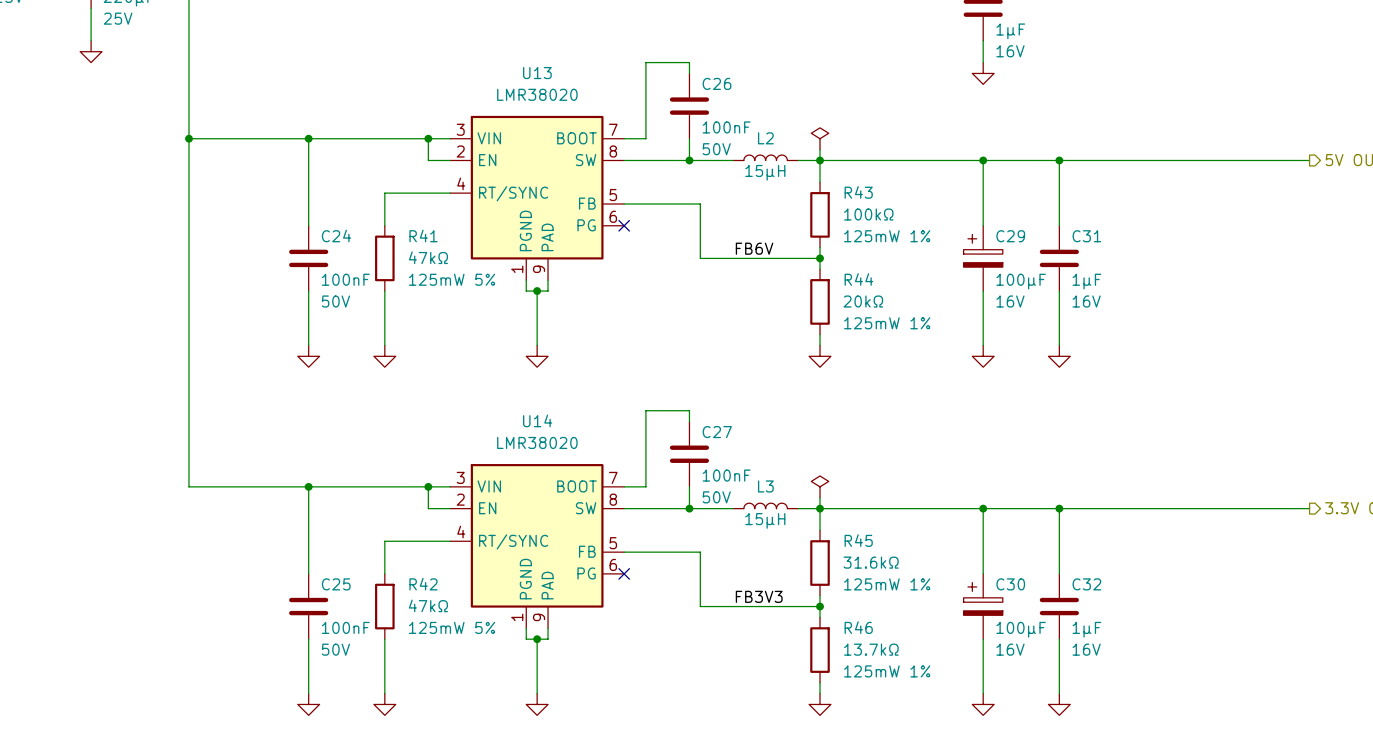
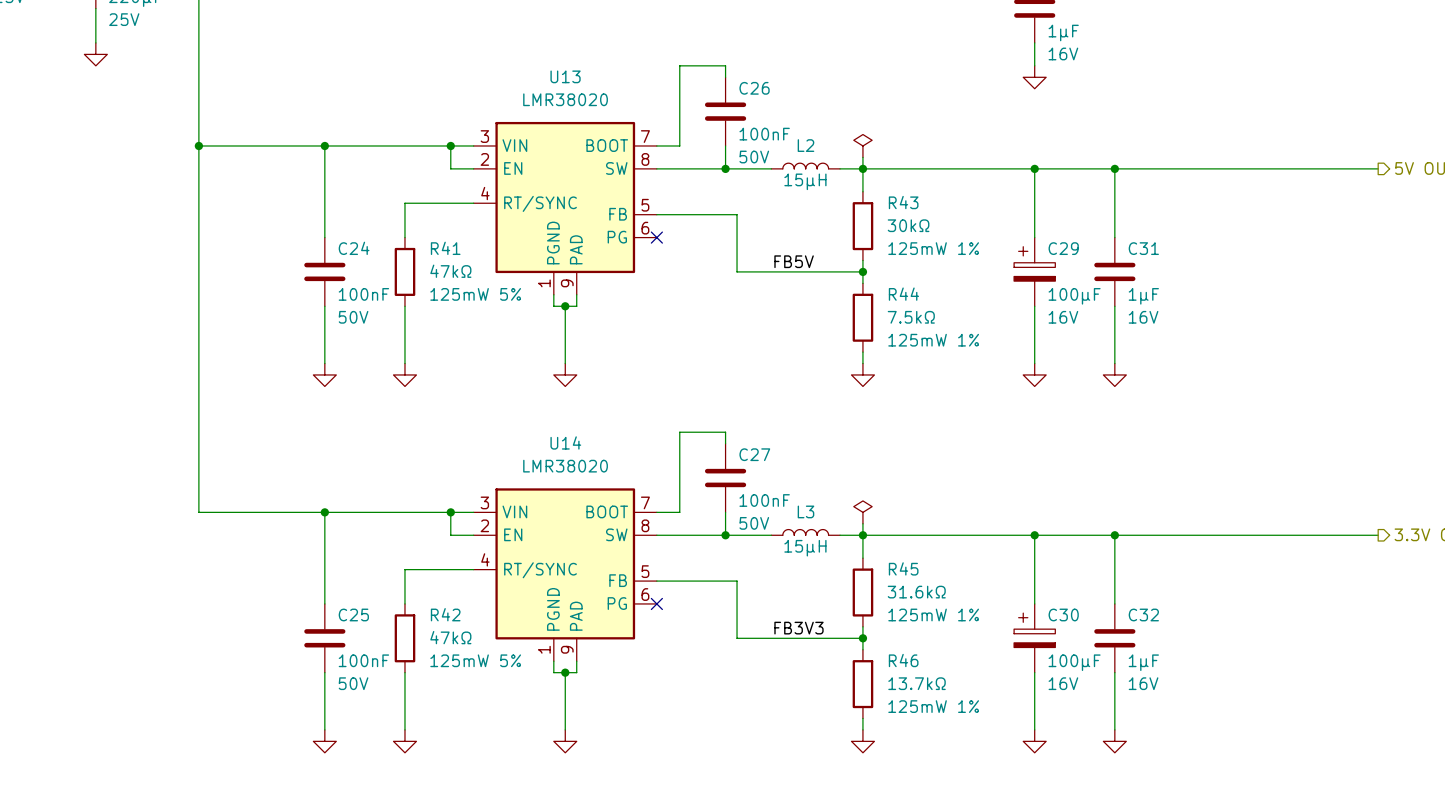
R43 value: 100kΩ (868, 214) -> 30kΩ (908, 225)
label: FB6V (754, 248) -> FB5V (794, 261)
R44 value: 20kΩ (863, 301) -> 7.5kΩ (911, 317)

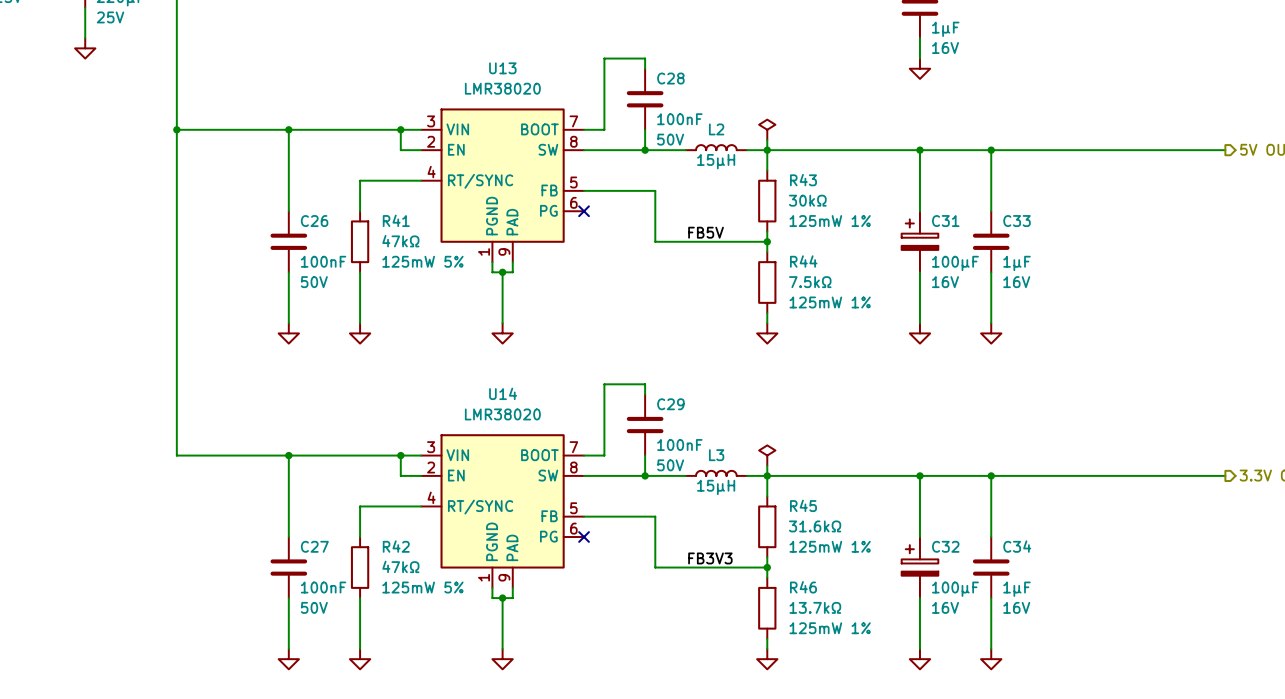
C26 name: C26 (754, 88) -> C28 (670, 78)
C24 name: C24 (354, 248) -> C26 (314, 221)
C29 name: C29 (1063, 248) -> C31 (945, 221)
C31 name: C31 (1143, 248) -> C33 (1017, 221)
C27 name: C27 (754, 454) -> C29 (670, 404)
C25 name: C25 (353, 614) -> C27 (314, 546)
C30 name: C30 (1063, 614) -> C32 (945, 546)
C32 name: C32 (1143, 614) -> C34 (1017, 546)

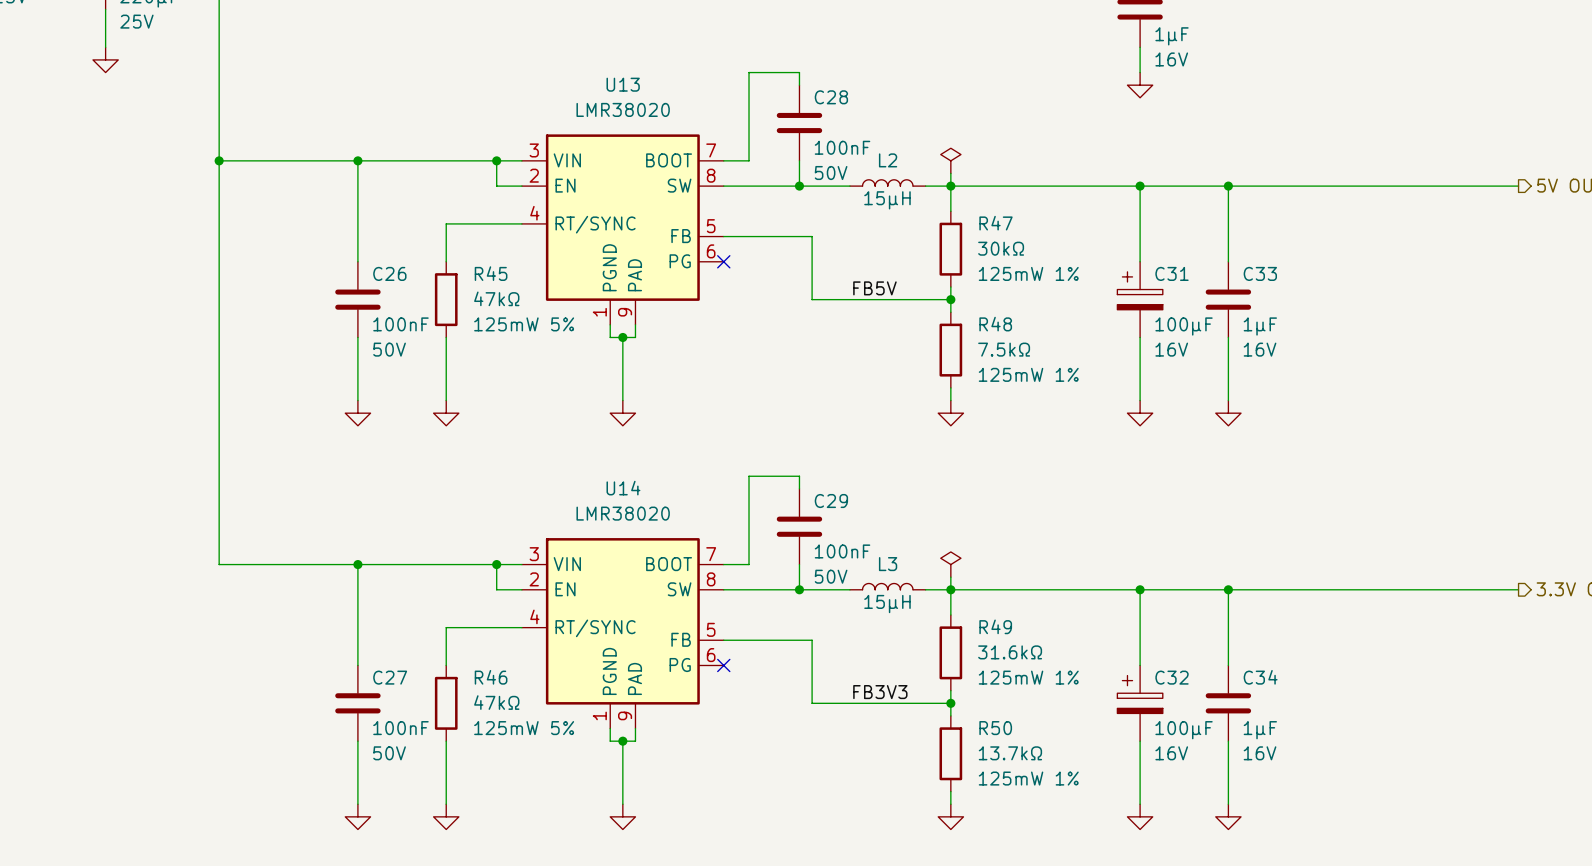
R43 name: R43 (803, 180) -> R47 (996, 223)
R41 name: R41 (396, 220) -> R45 (491, 273)
R44 name: R44 (803, 261) -> R48 (995, 324)
R45 name: R45 (803, 505) -> R49 (995, 626)
R42 name: R42 (396, 546) -> R46 (491, 677)
R46 name: R46 (803, 587) -> R50 (995, 728)

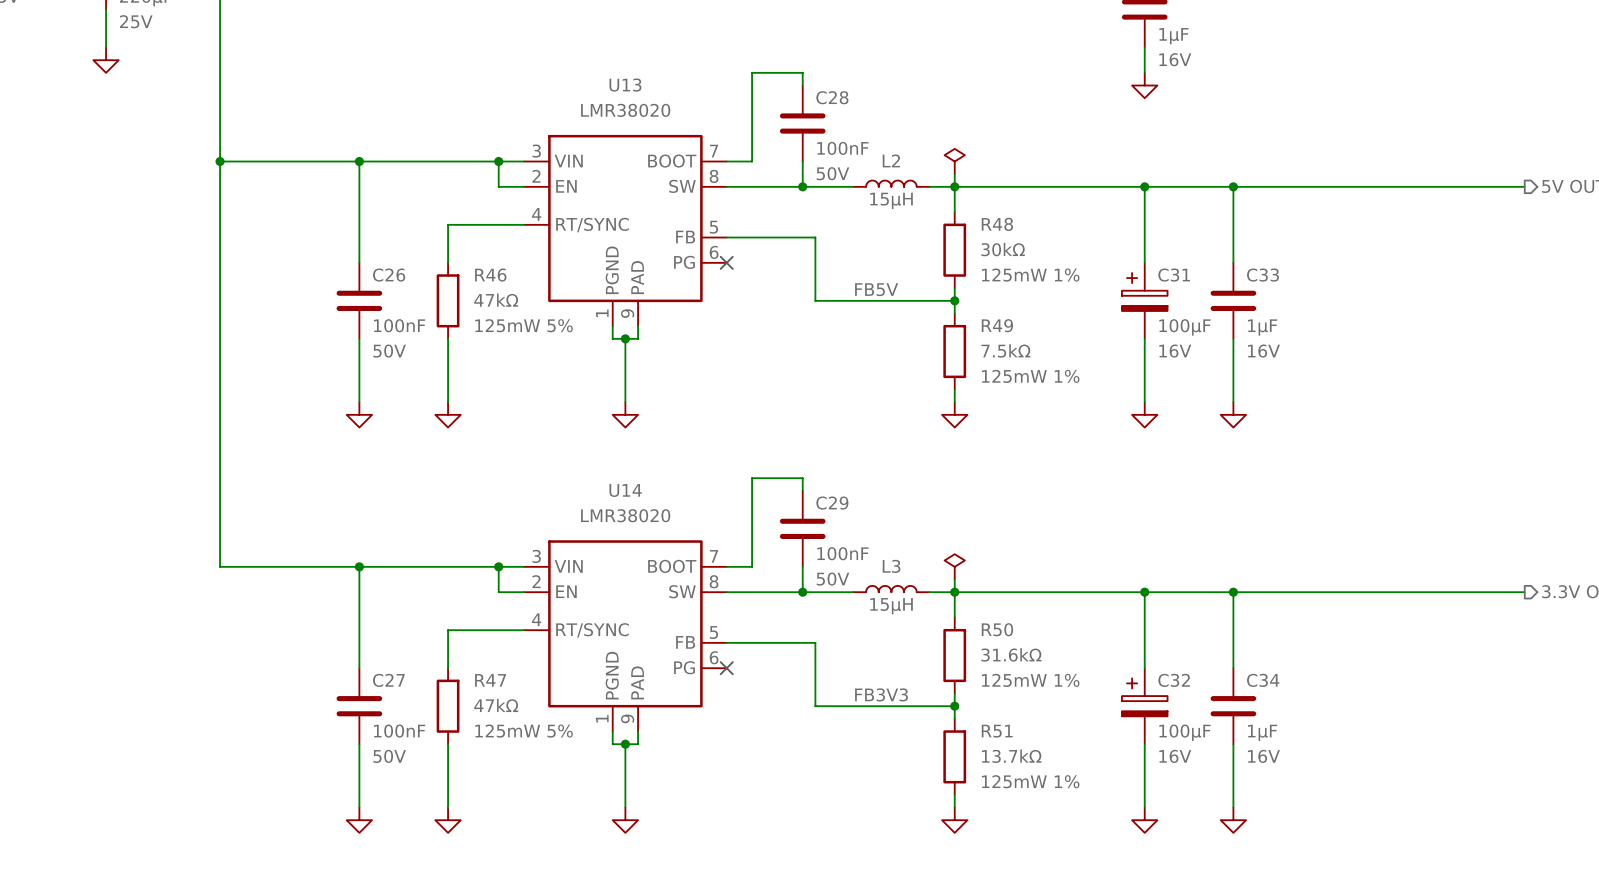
R47 name: R47 (996, 223) -> R48 (997, 224)
R45 name: R45 (491, 273) -> R46 (490, 275)
R48 name: R48 (995, 324) -> R49 (997, 325)
R49 name: R49 (995, 626) -> R50 (997, 629)
R46 name: R46 (491, 677) -> R47 (490, 680)
R50 name: R50 (995, 728) -> R51 (997, 731)

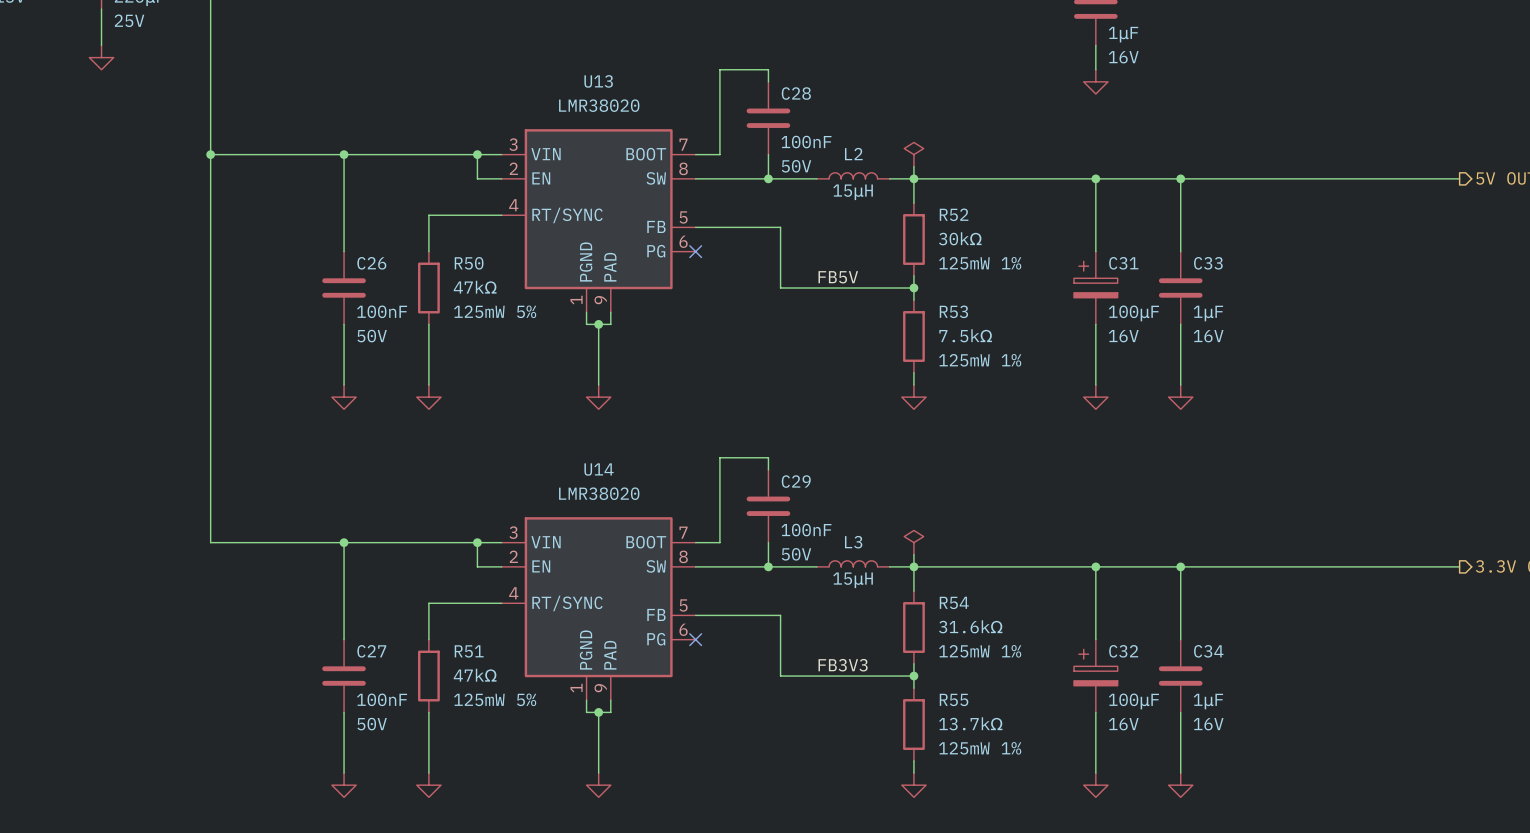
R48 name: R48 (997, 224) -> R52 (954, 214)
R46 name: R46 (490, 275) -> R50 (469, 263)
R49 name: R49 (997, 325) -> R53 (953, 311)
R50 name: R50 (997, 629) -> R54 (954, 602)
R47 name: R47 (490, 680) -> R51 (469, 651)
R51 name: R51 (997, 731) -> R55 (954, 699)

